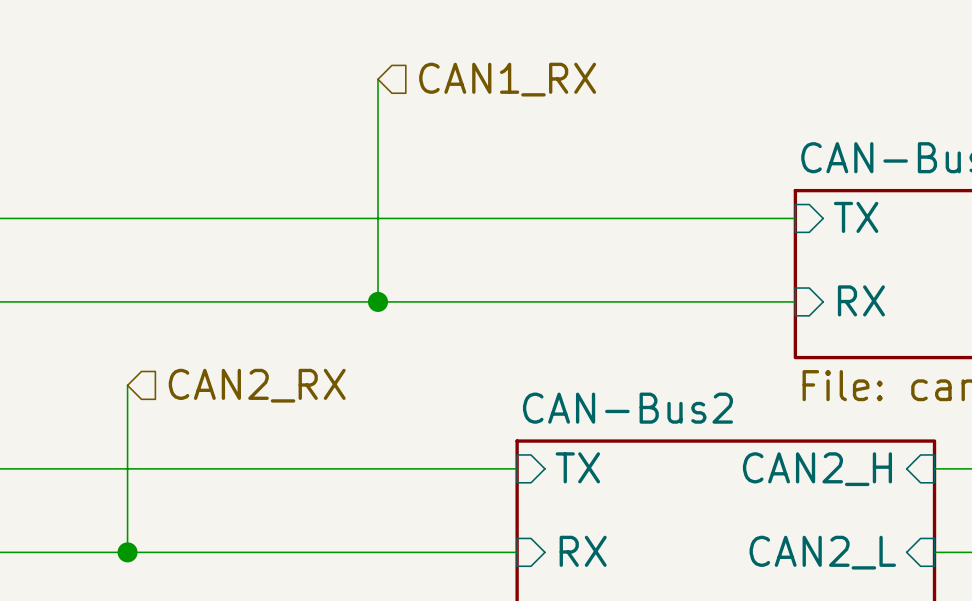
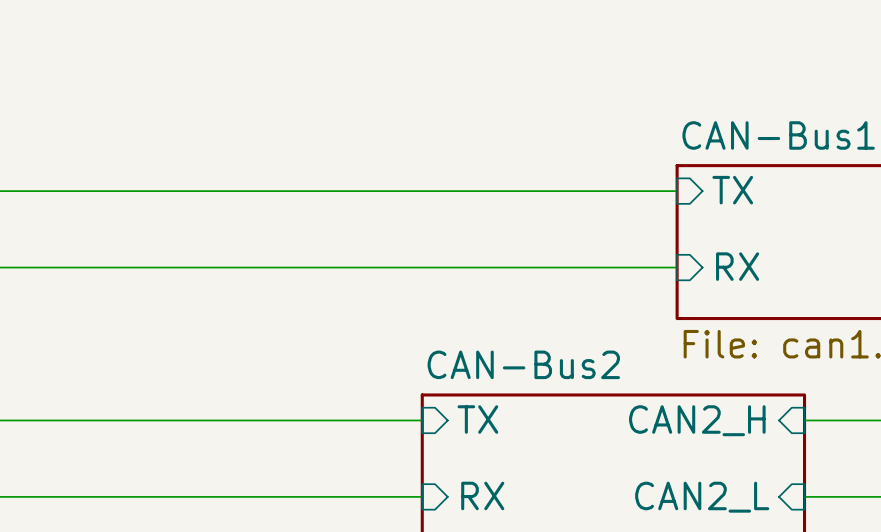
wire: (377, 79) (377, 301) -> none
hierarchical label: CAN1_RX (507, 79) -> none
junction: (377, 301) -> none
wire: (127, 385) (127, 552) -> none
hierarchical label: CAN2_RX (257, 385) -> none
junction: (127, 552) -> none

